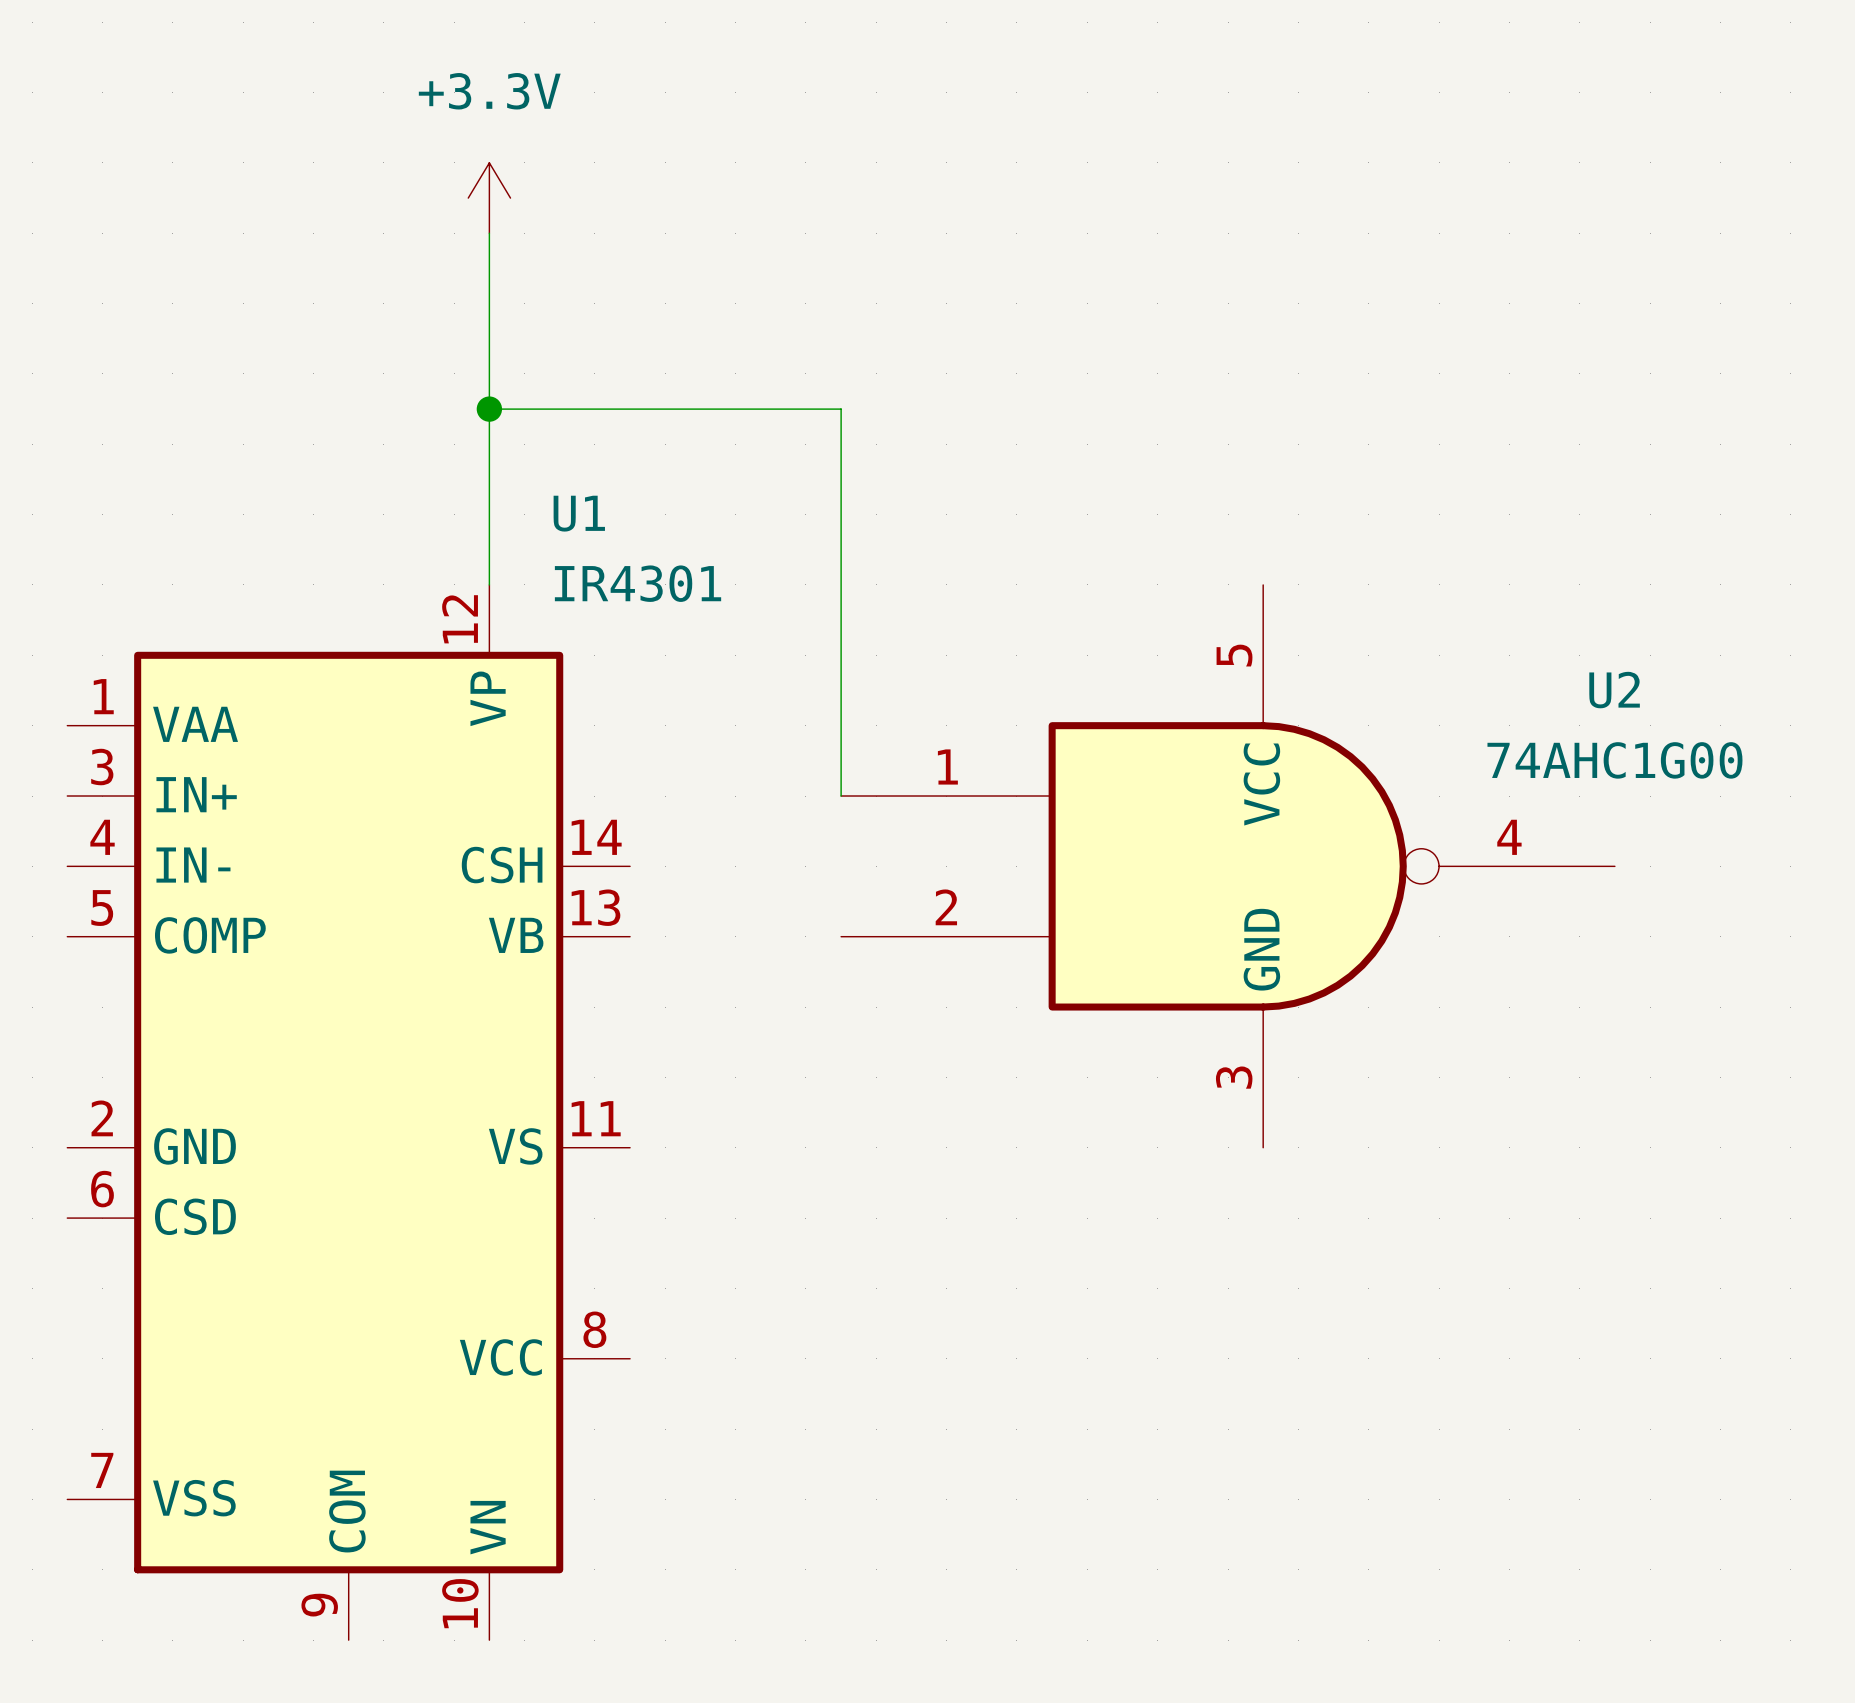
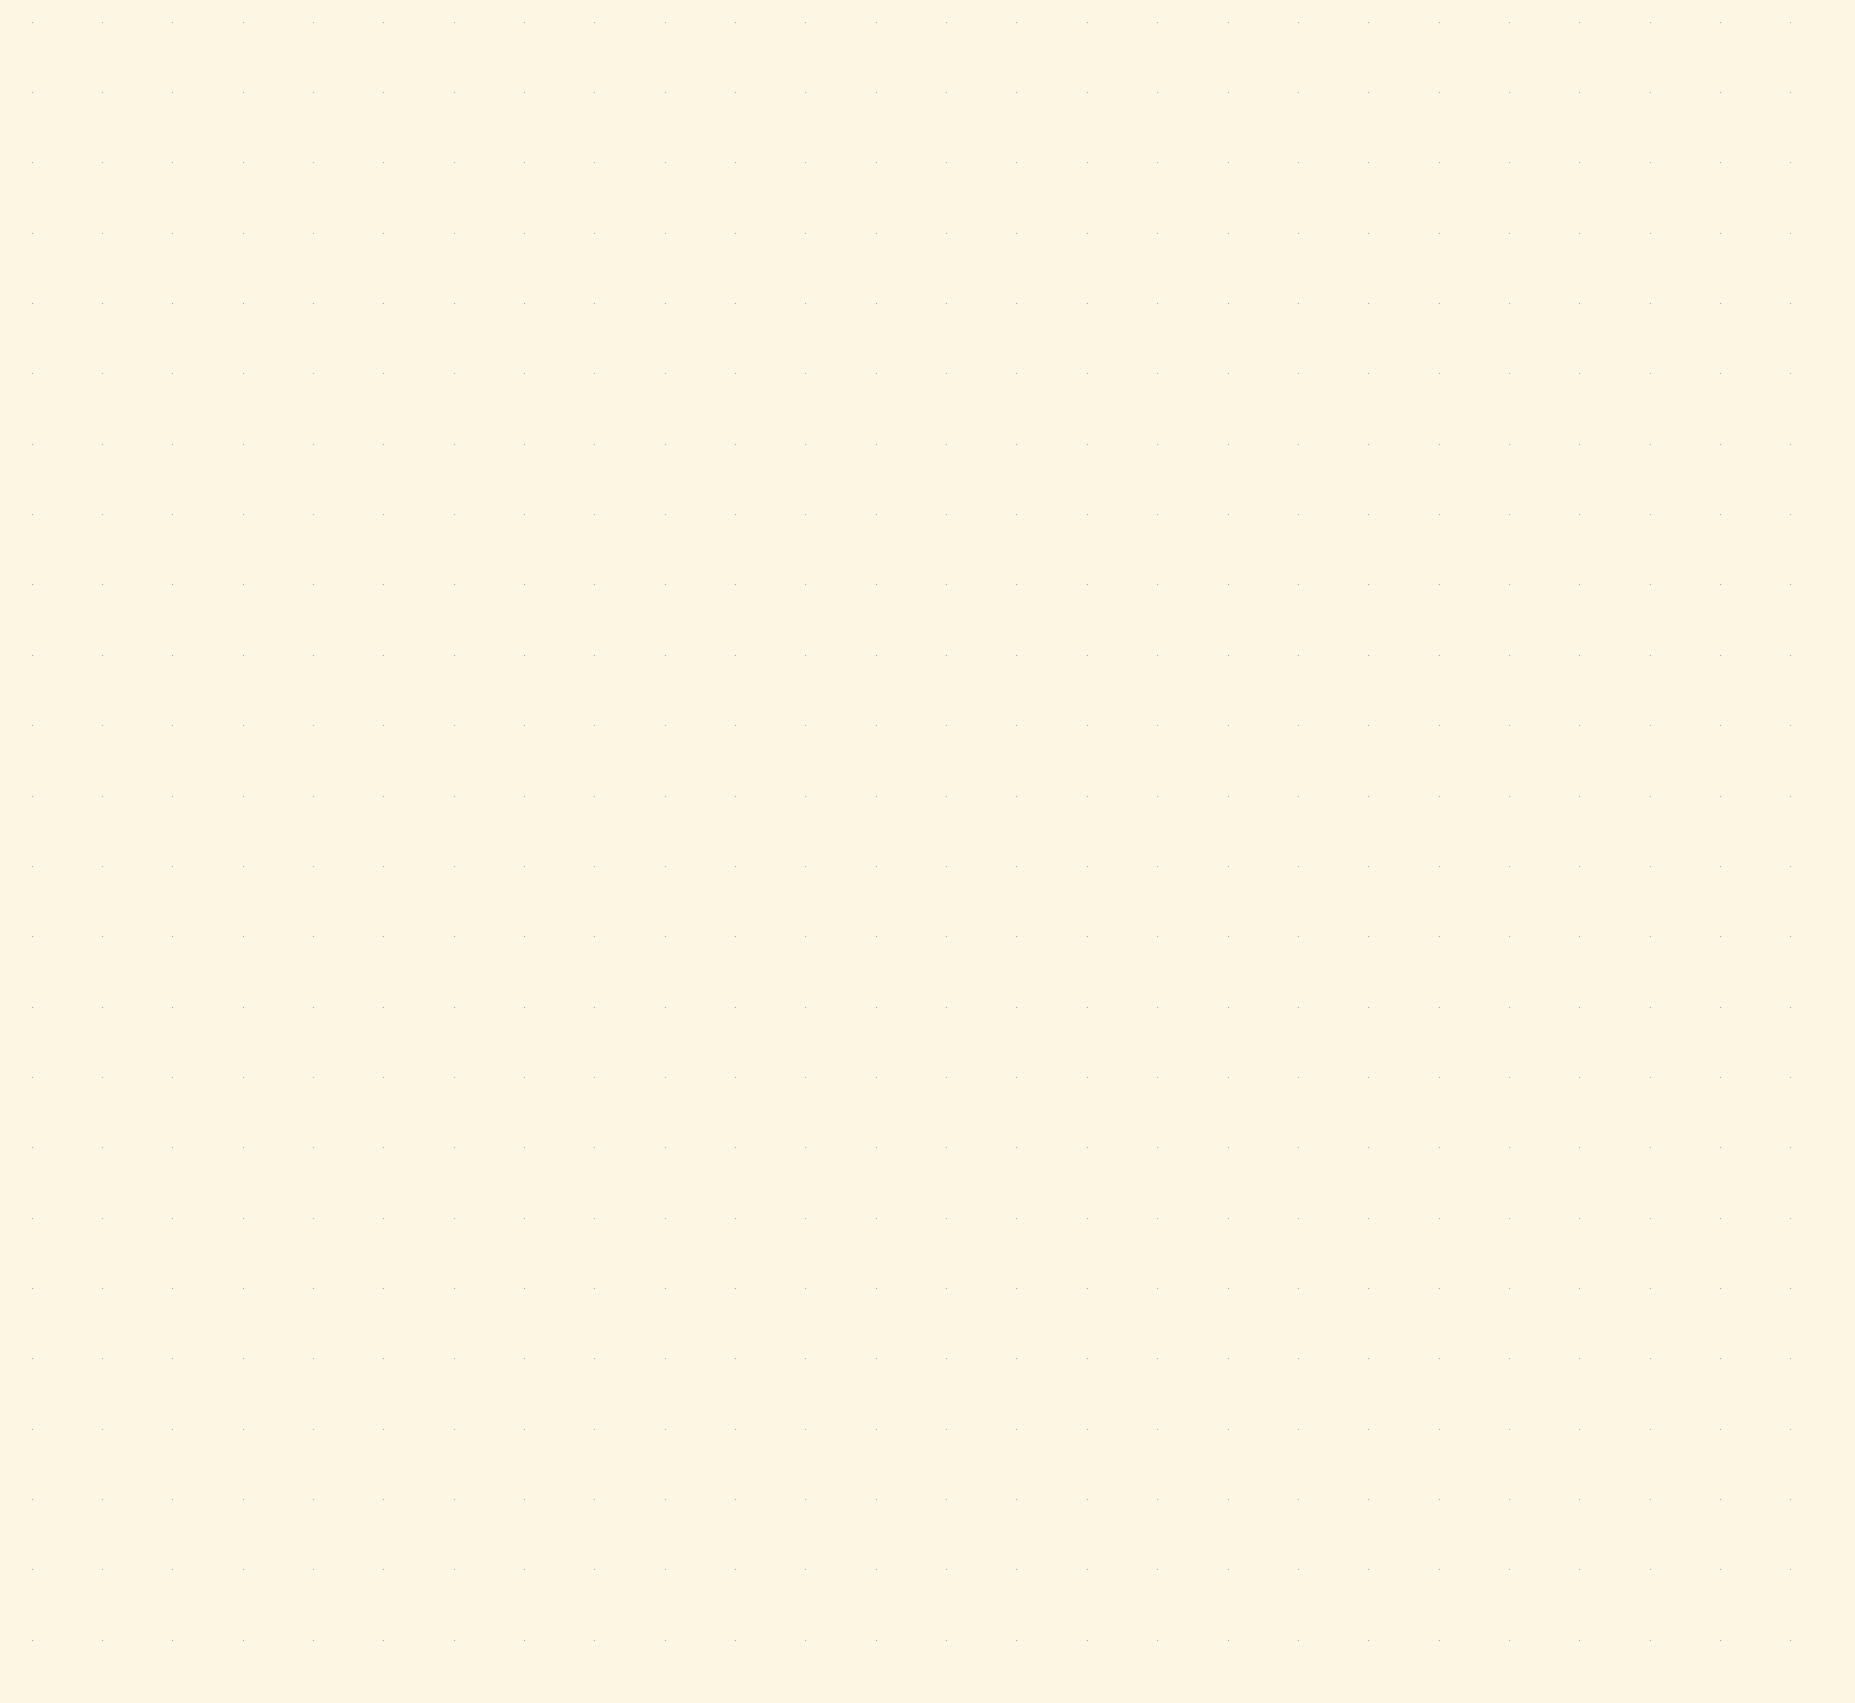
power symbol: +3.3V (489, 198) -> none
wire: (489, 233) (489, 584) -> none
wire: (489, 409) (841, 409) (841, 796) -> none
junction: (489, 409) -> none
U2: 74AHC1G00 (1228, 866) -> none
U1: IR4301 (348, 1112) -> none

